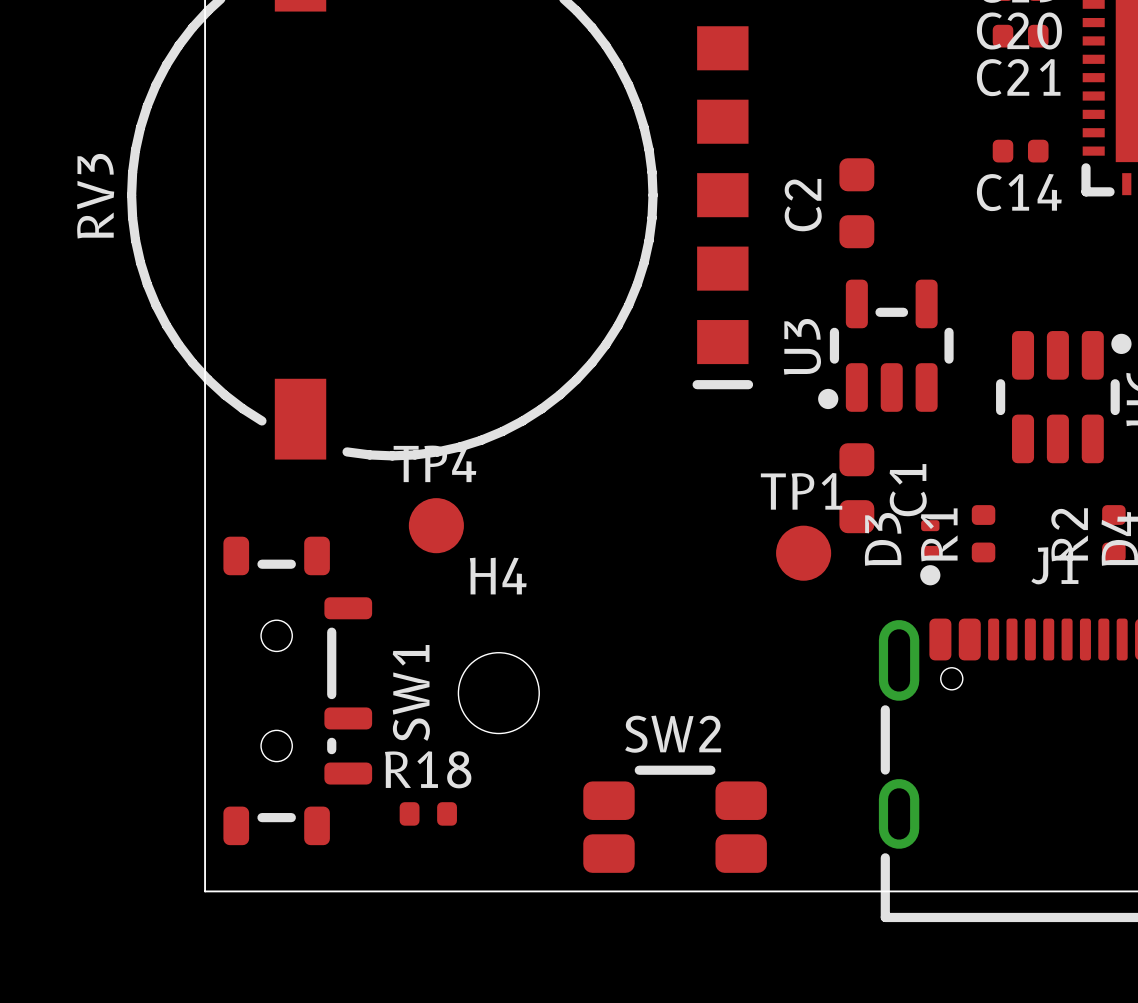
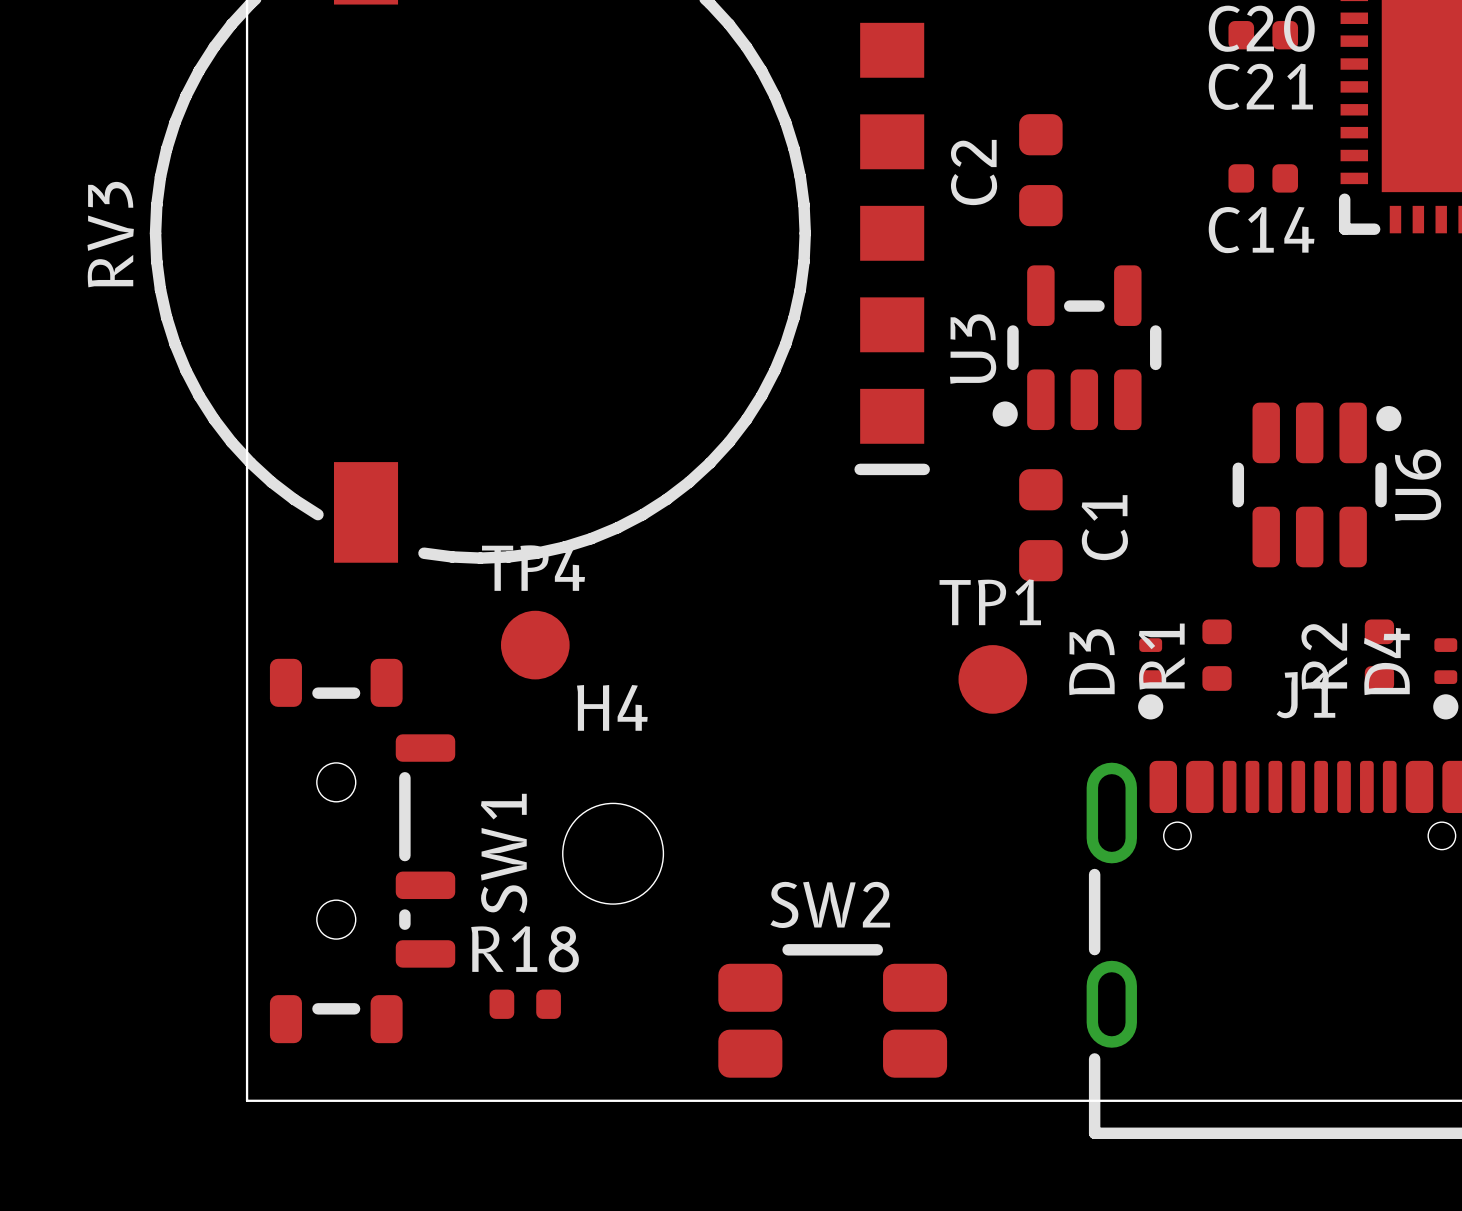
C2 position: (856, 203) -> (1040, 170)
U3 position: (885, 345) -> (1077, 347)
C1 position: (856, 488) -> (1040, 525)

